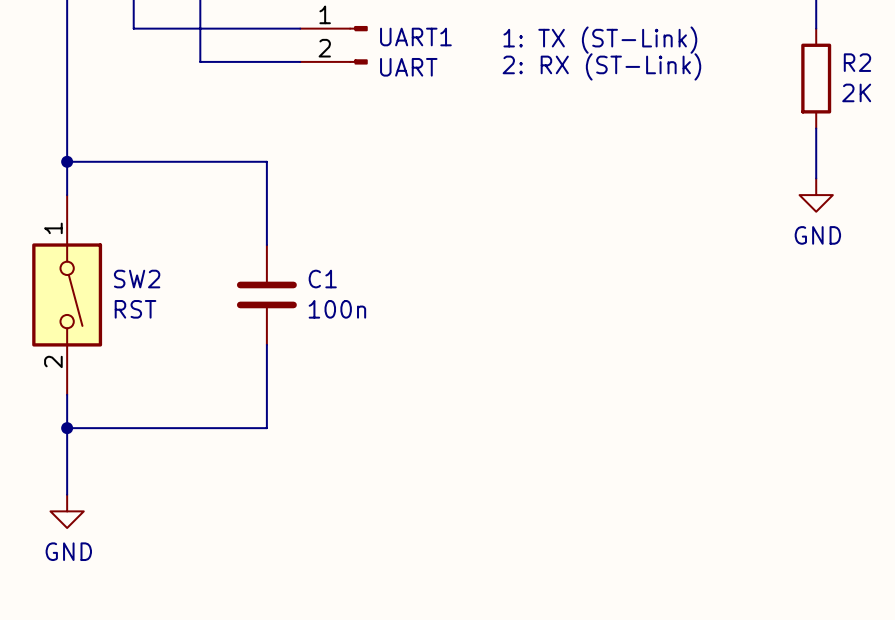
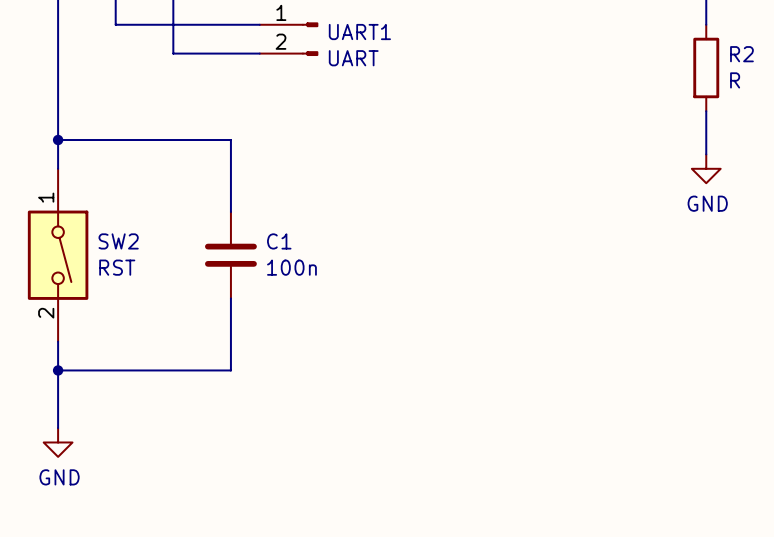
text: 1: TX (ST-Link) (600, 40) -> none
text: 2: RX (ST-Link) (601, 66) -> none
R2 value: 2K (856, 92) -> R (735, 80)

